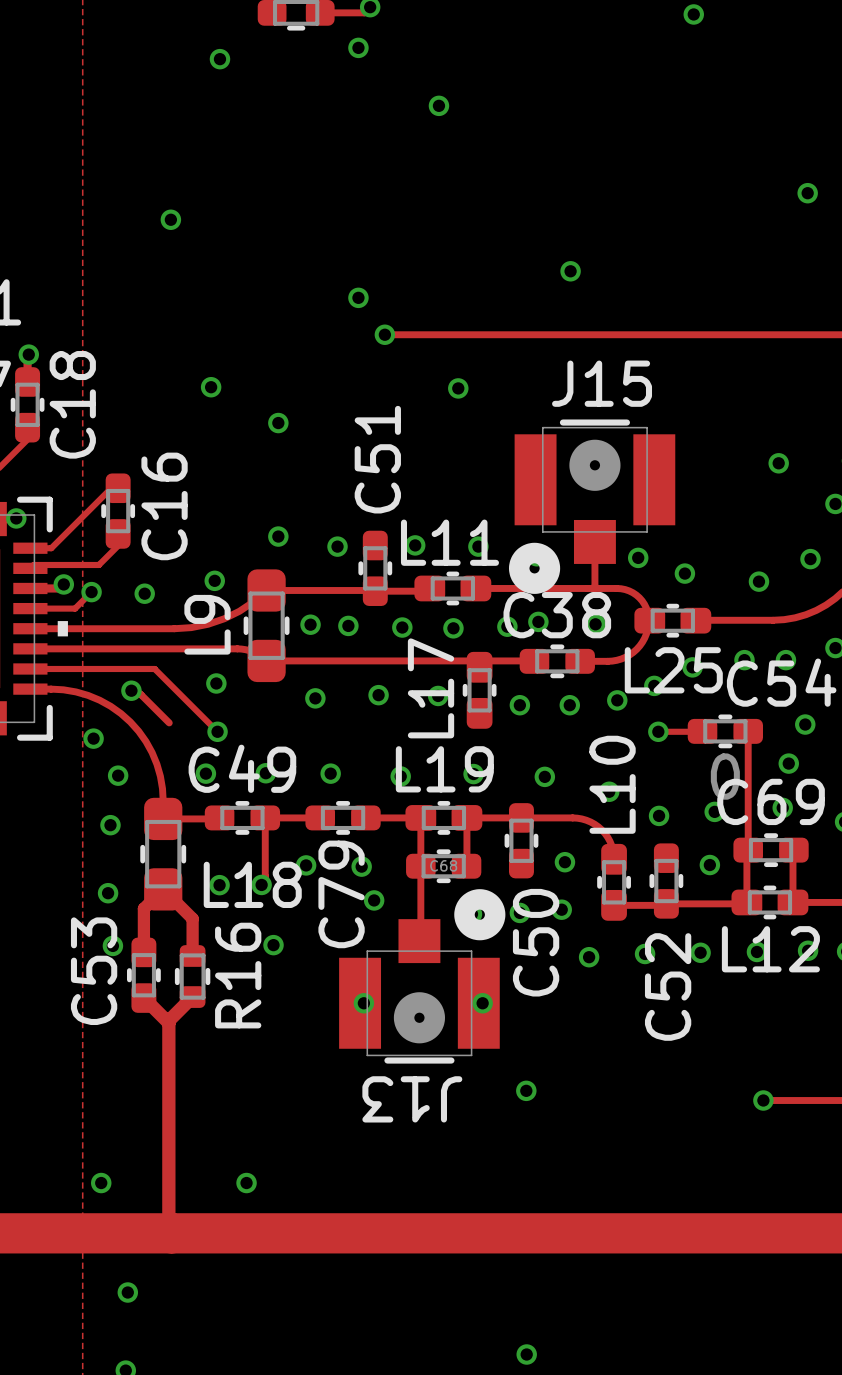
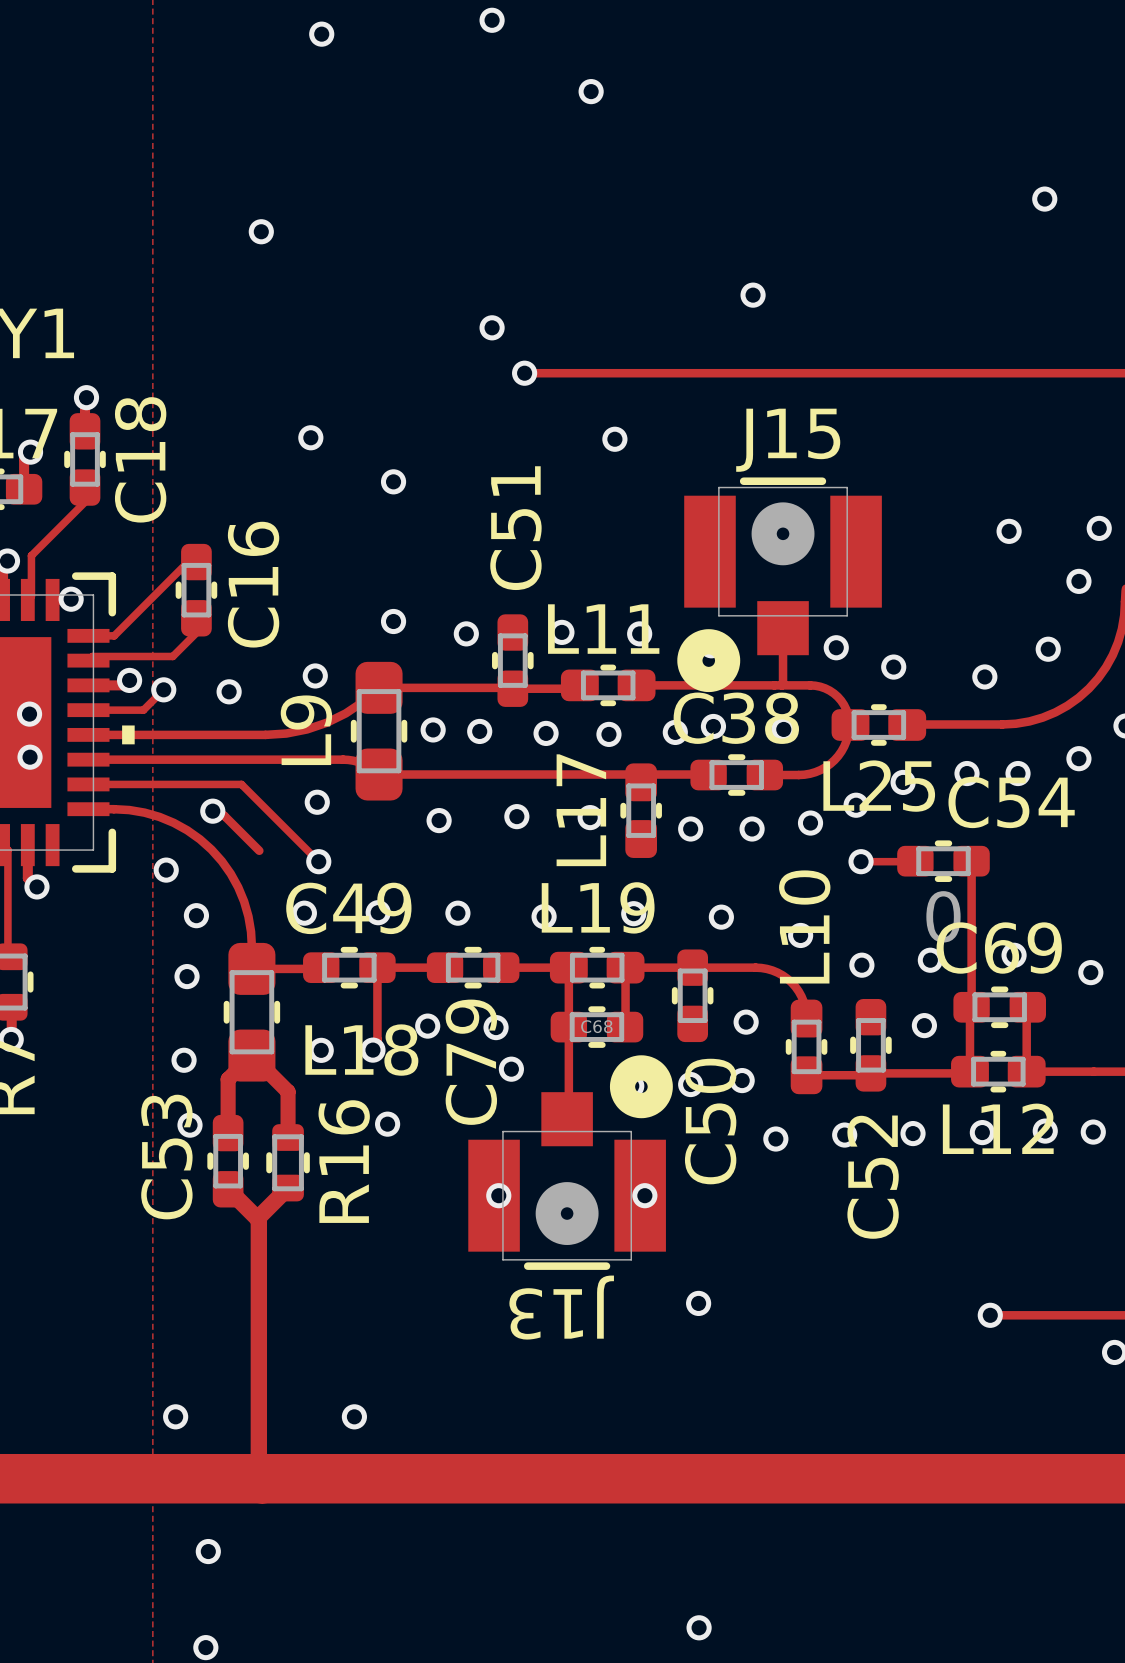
via: (805, 724) -> none
via: (788, 763) -> none

